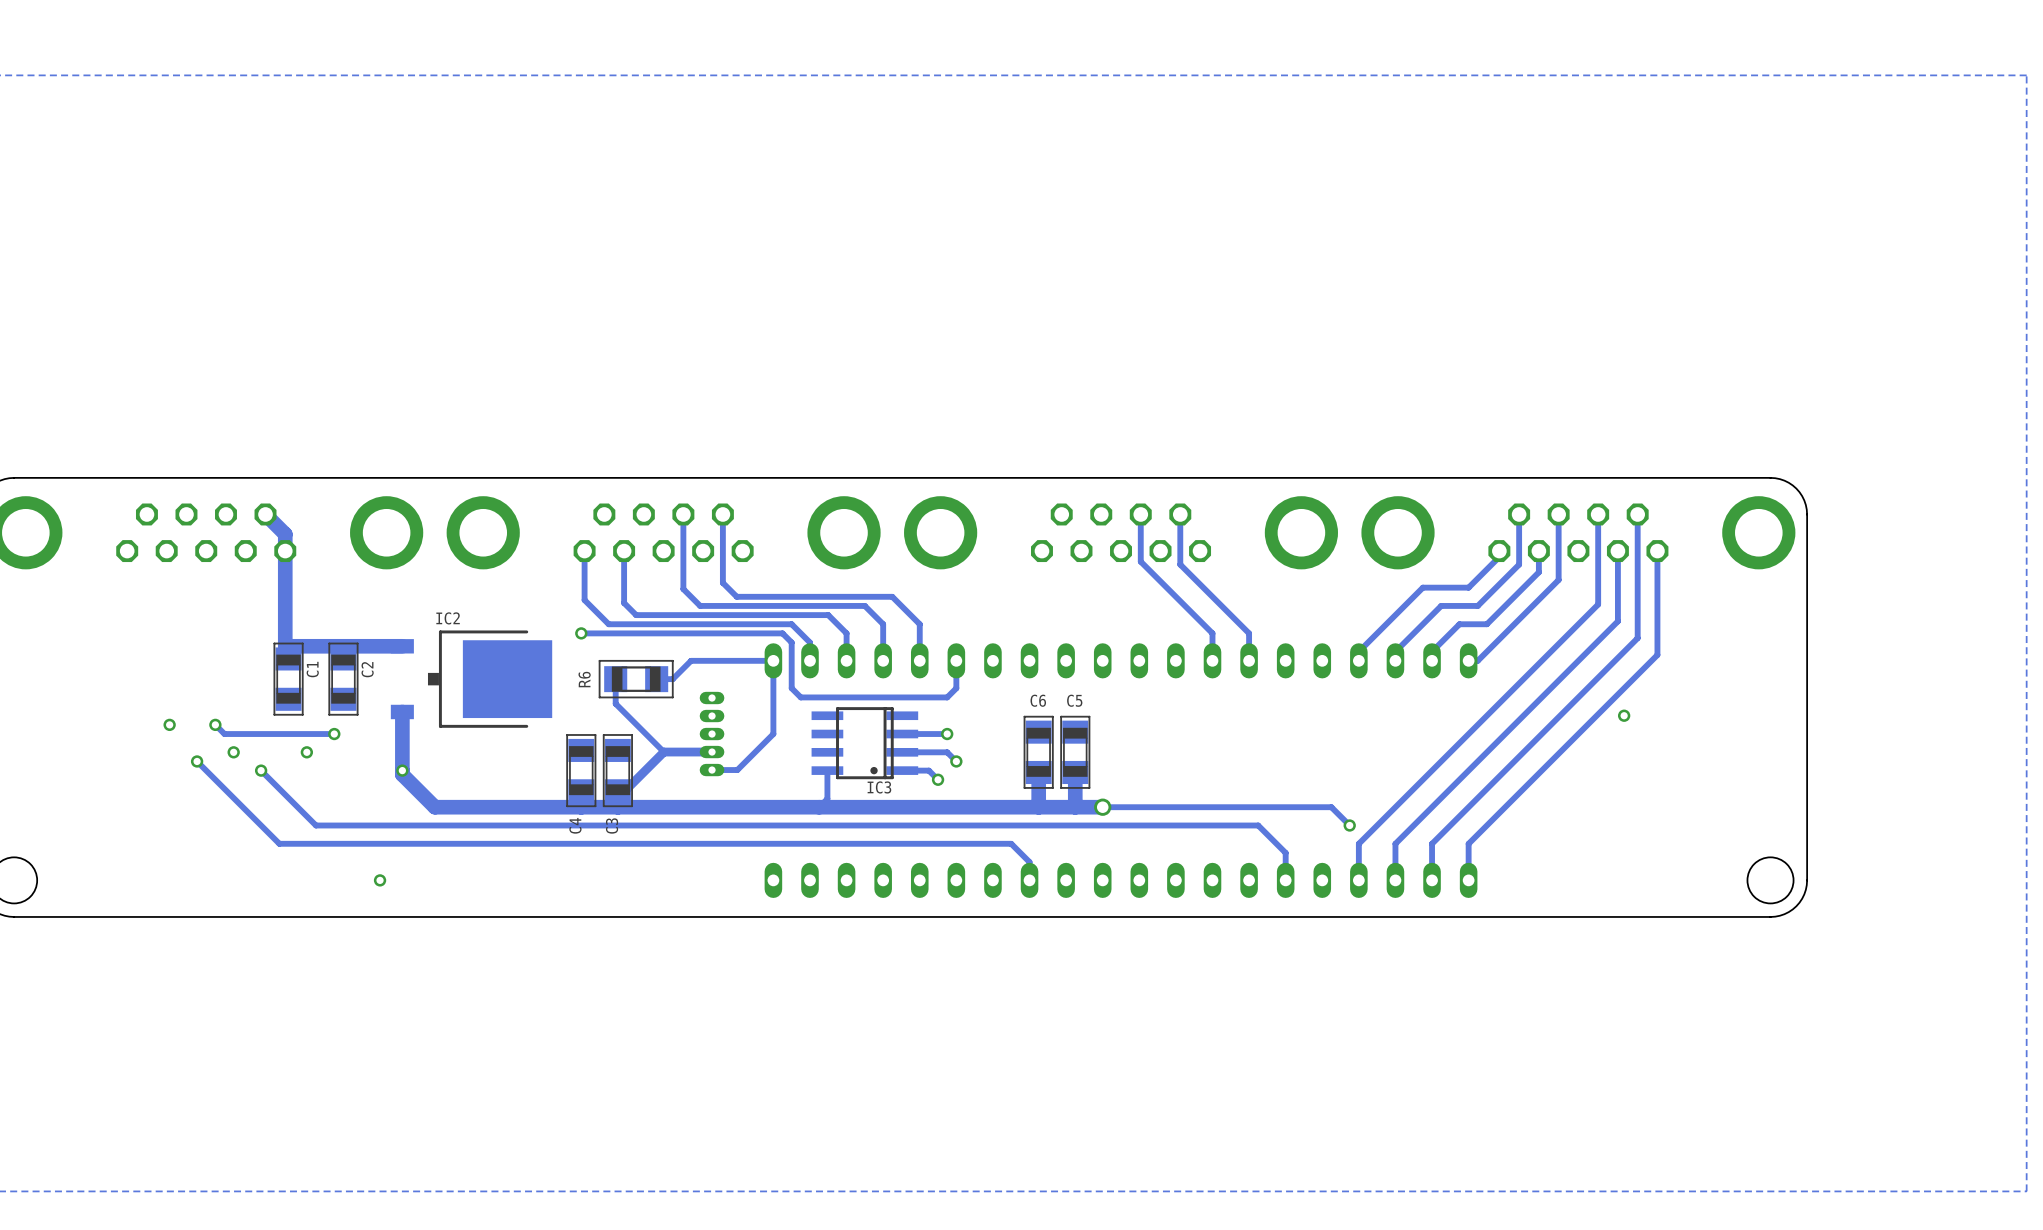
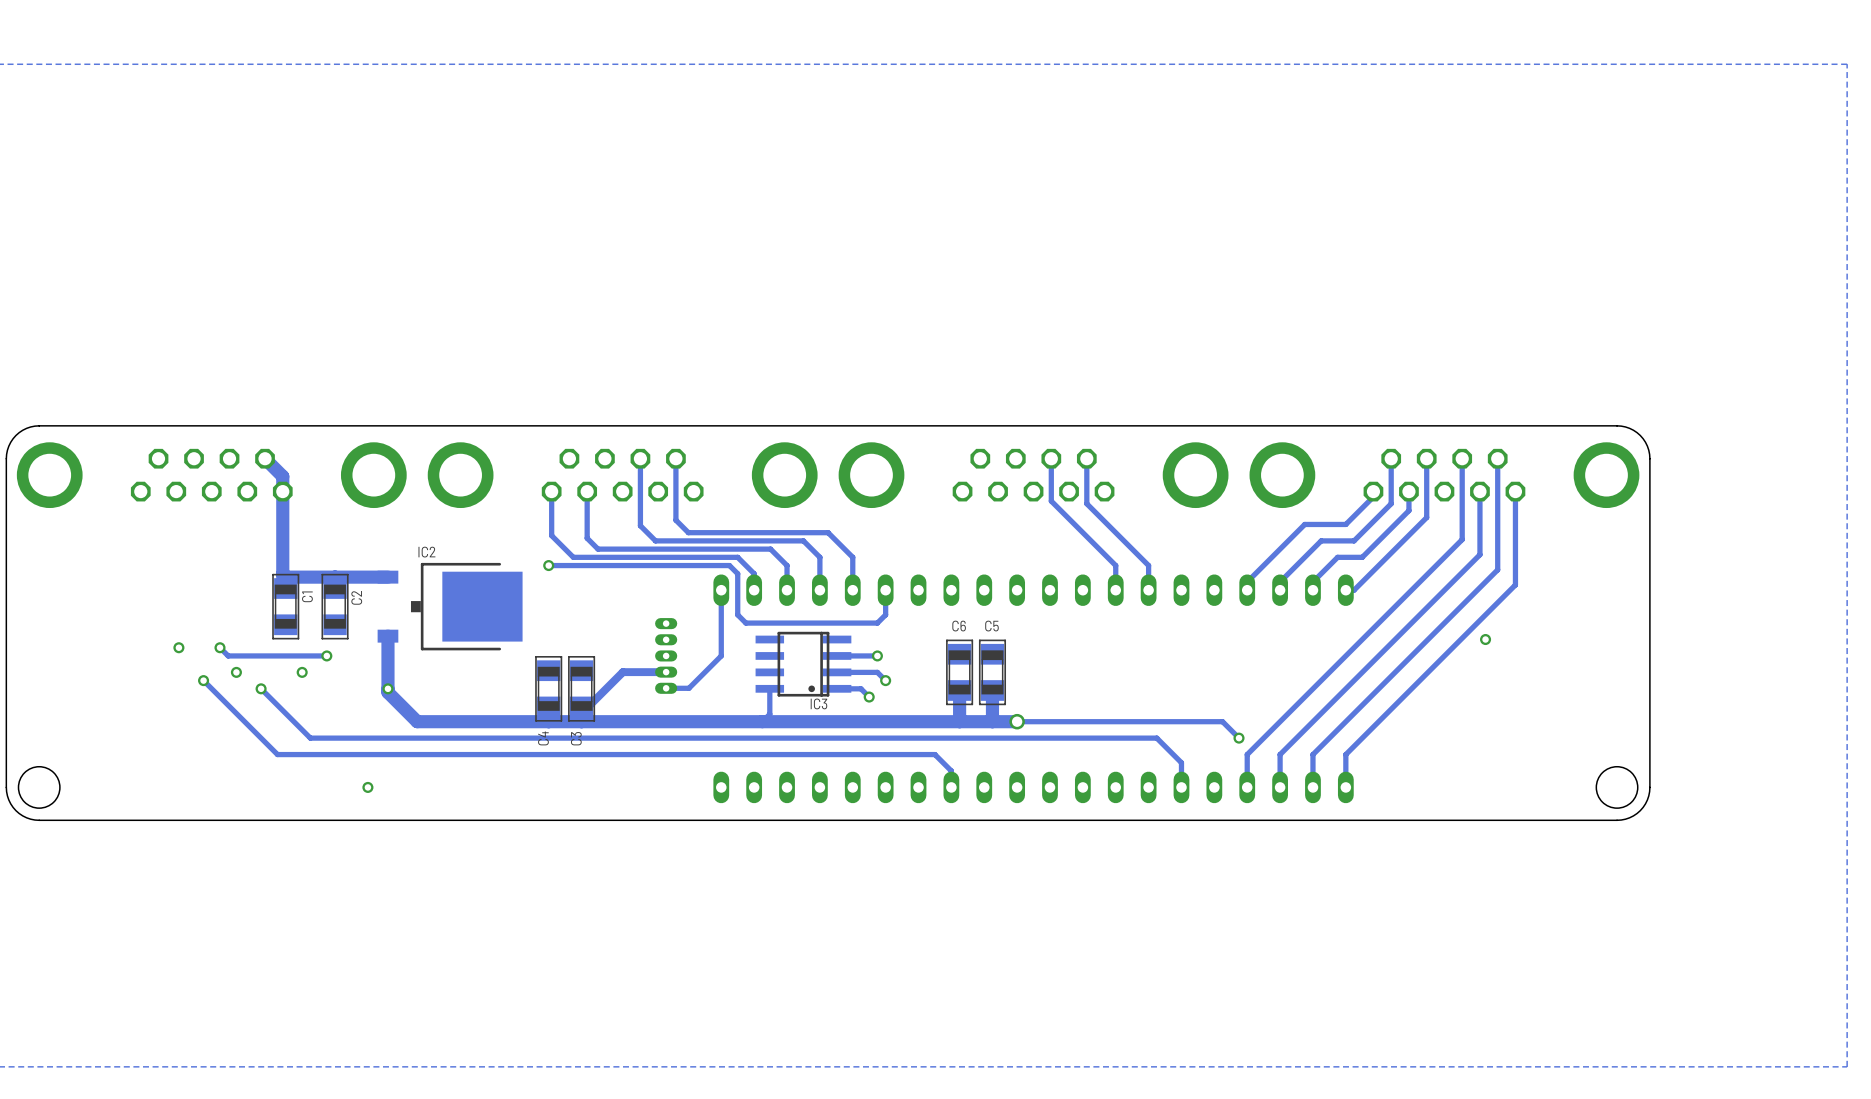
track: (773, 660) (691, 660) (672, 679) (656, 679) -> none
track: (615, 679) (615, 703) (663, 752) -> none
R6: (636, 679) -> none

